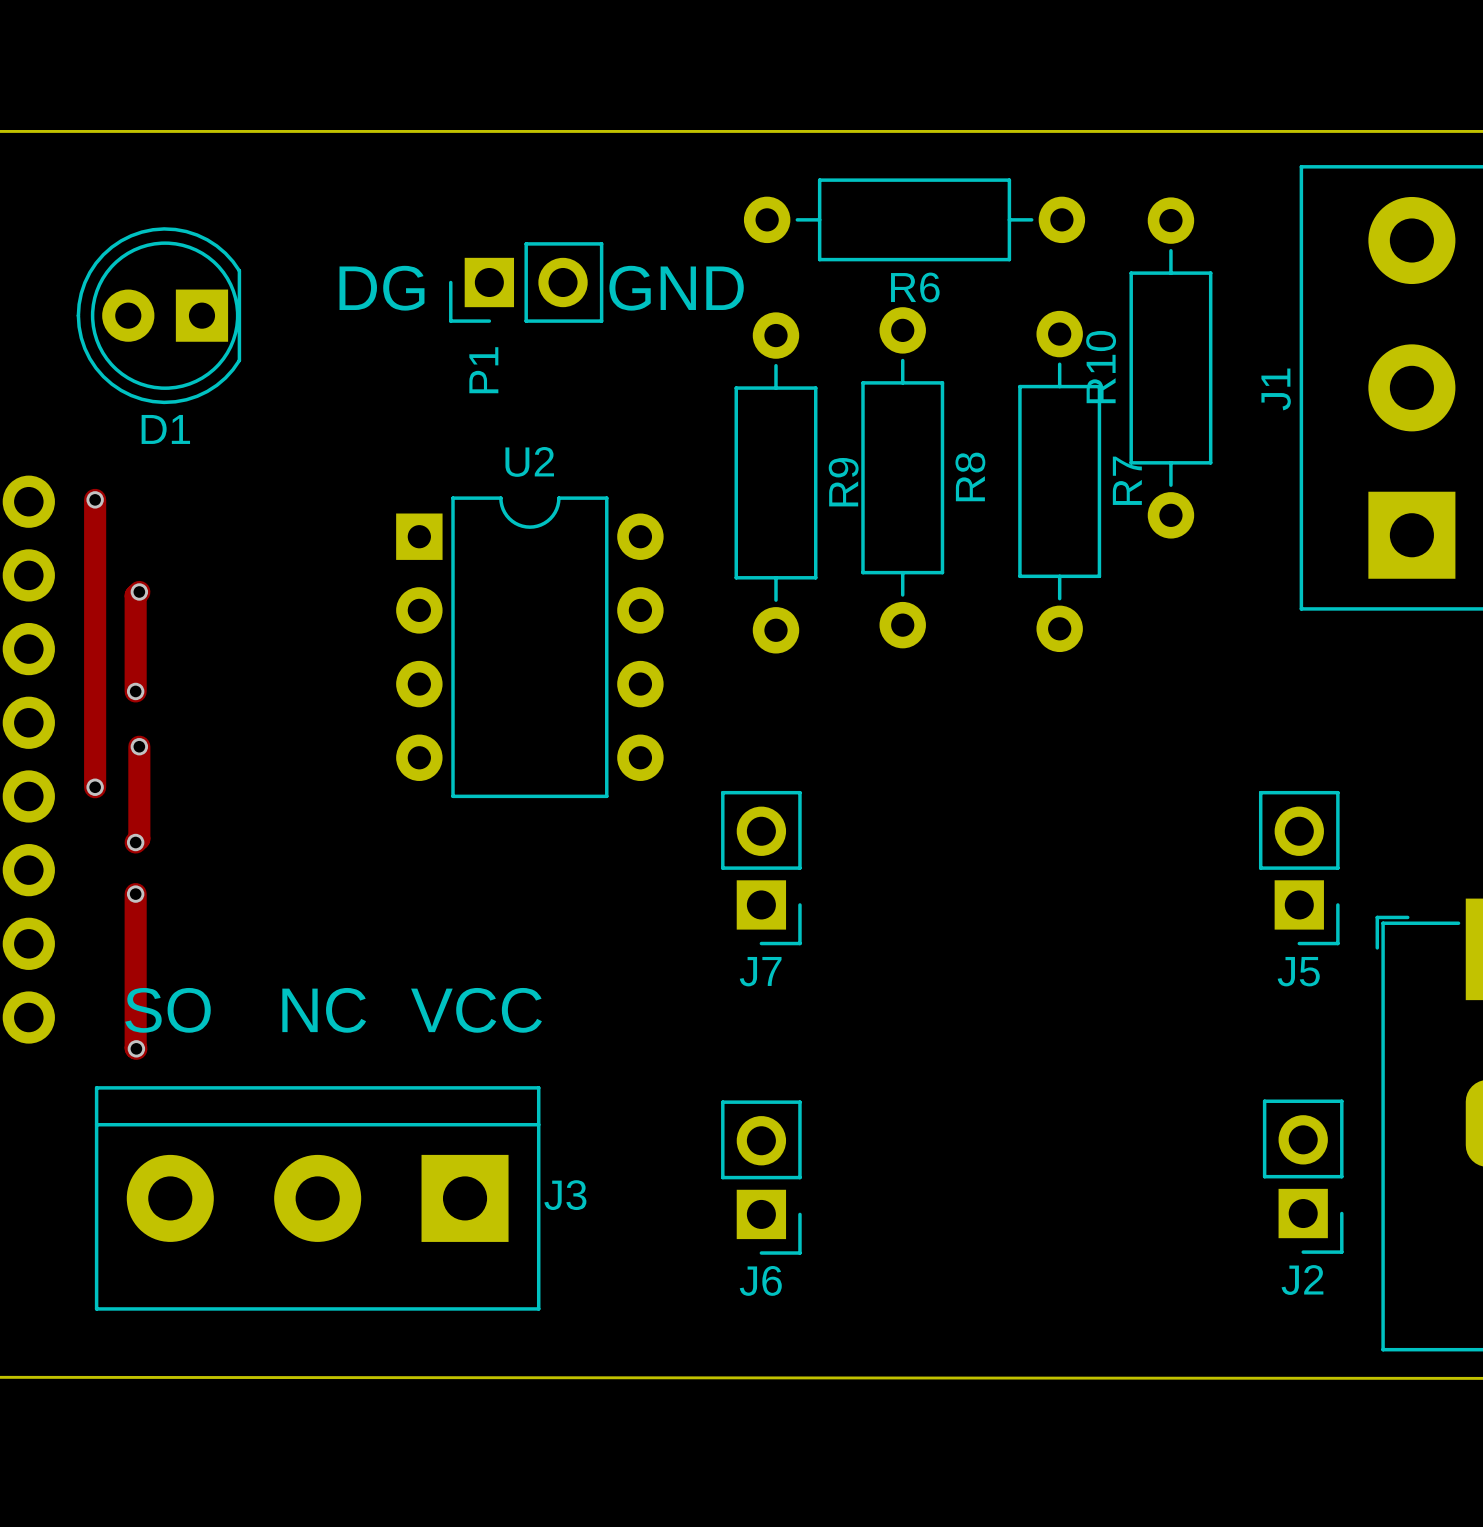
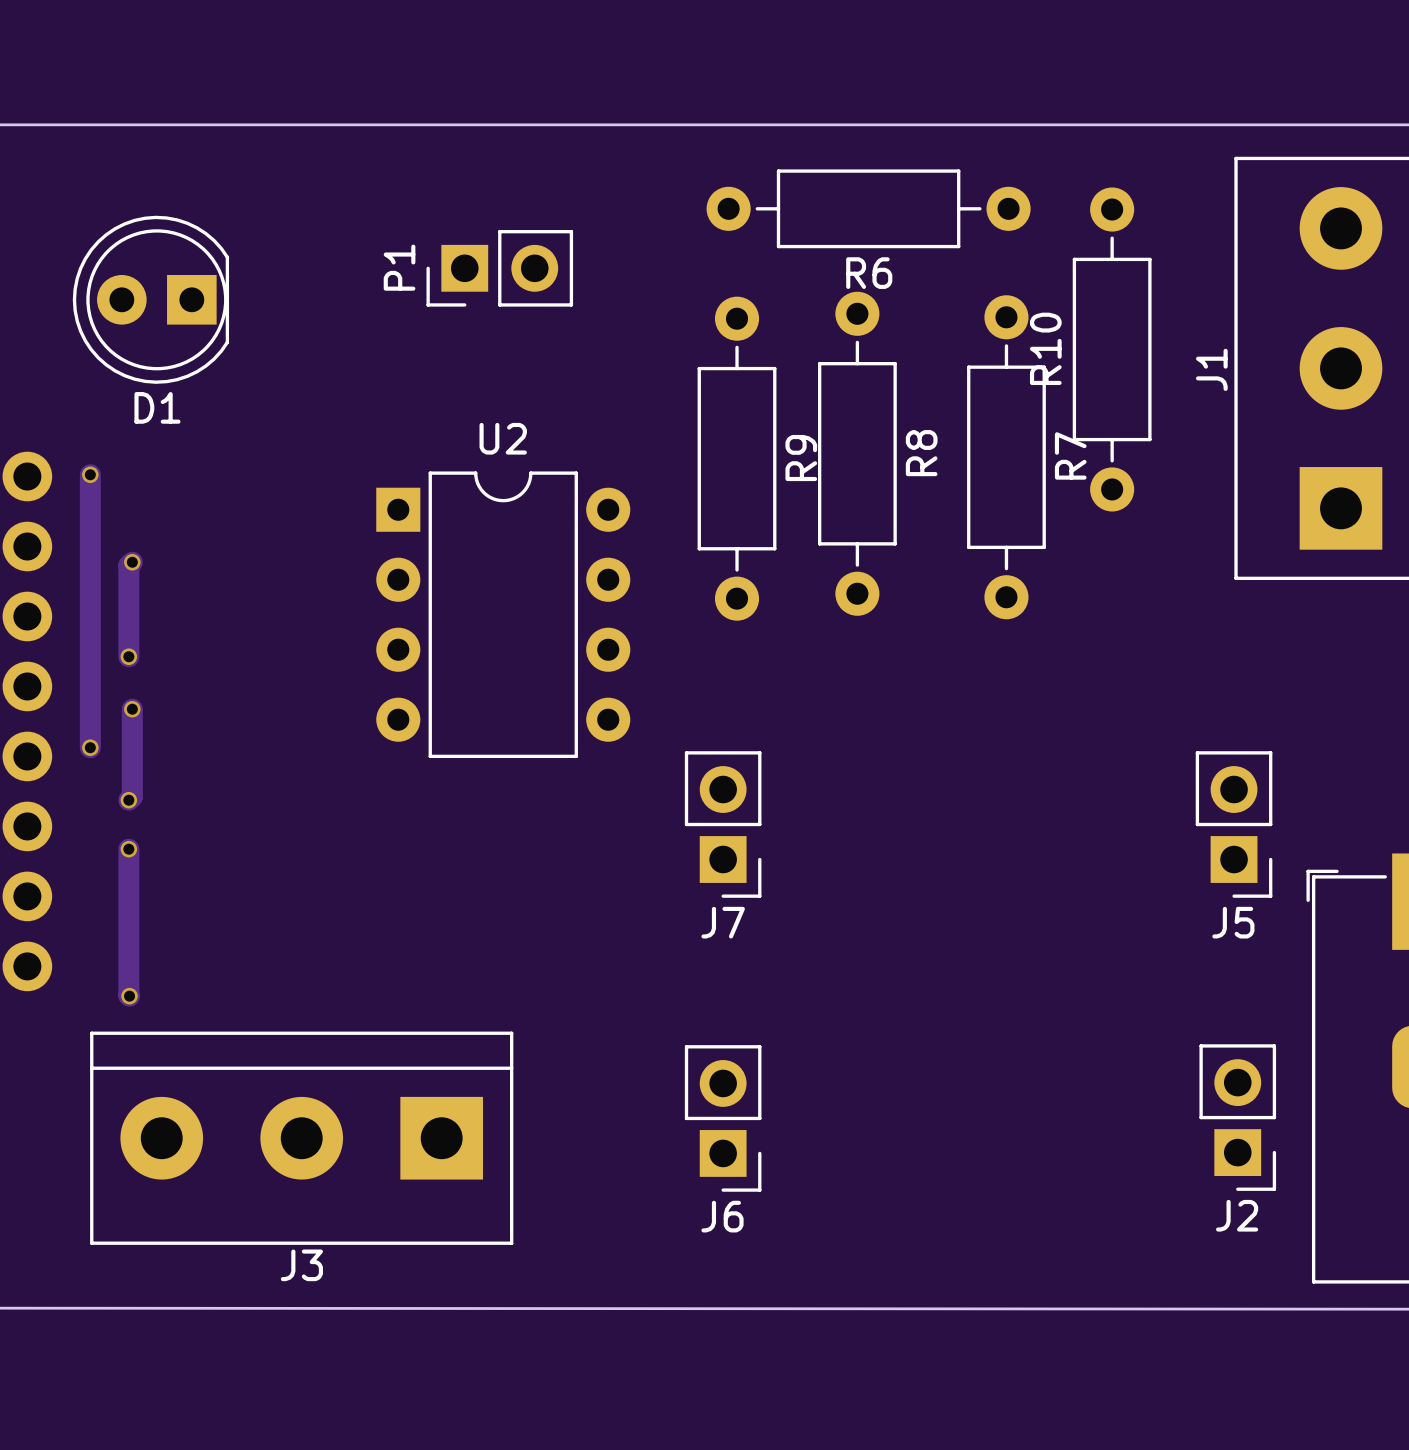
text: DG (382, 288) -> none
text: GND (676, 288) -> none
P1 name position: P1 (483, 370) -> P1 (399, 267)
text: SO (168, 1010) -> none
text: NC (324, 1010) -> none
text: VCC (476, 1010) -> none
J3 name position: J3 (565, 1195) -> J3 (301, 1265)

